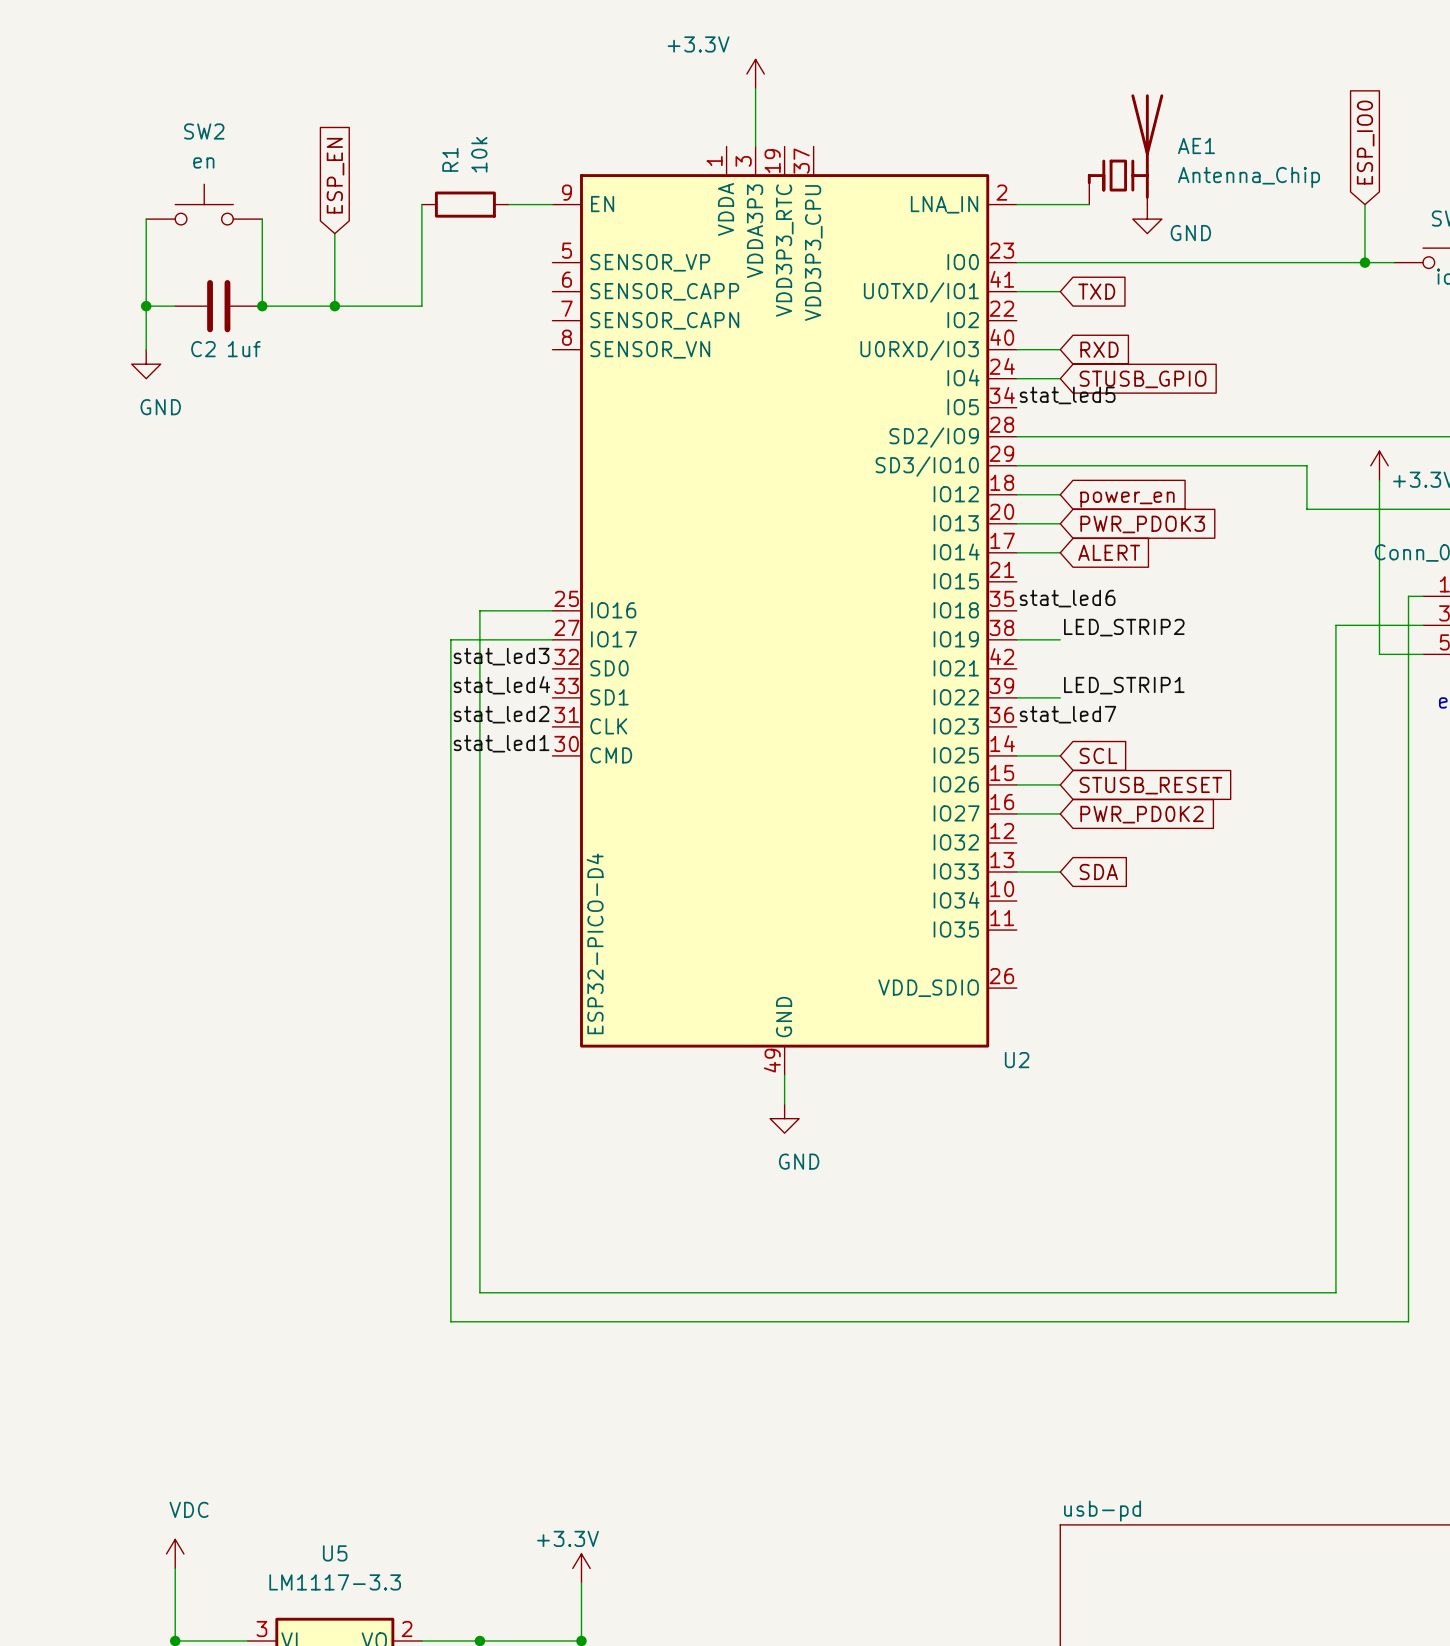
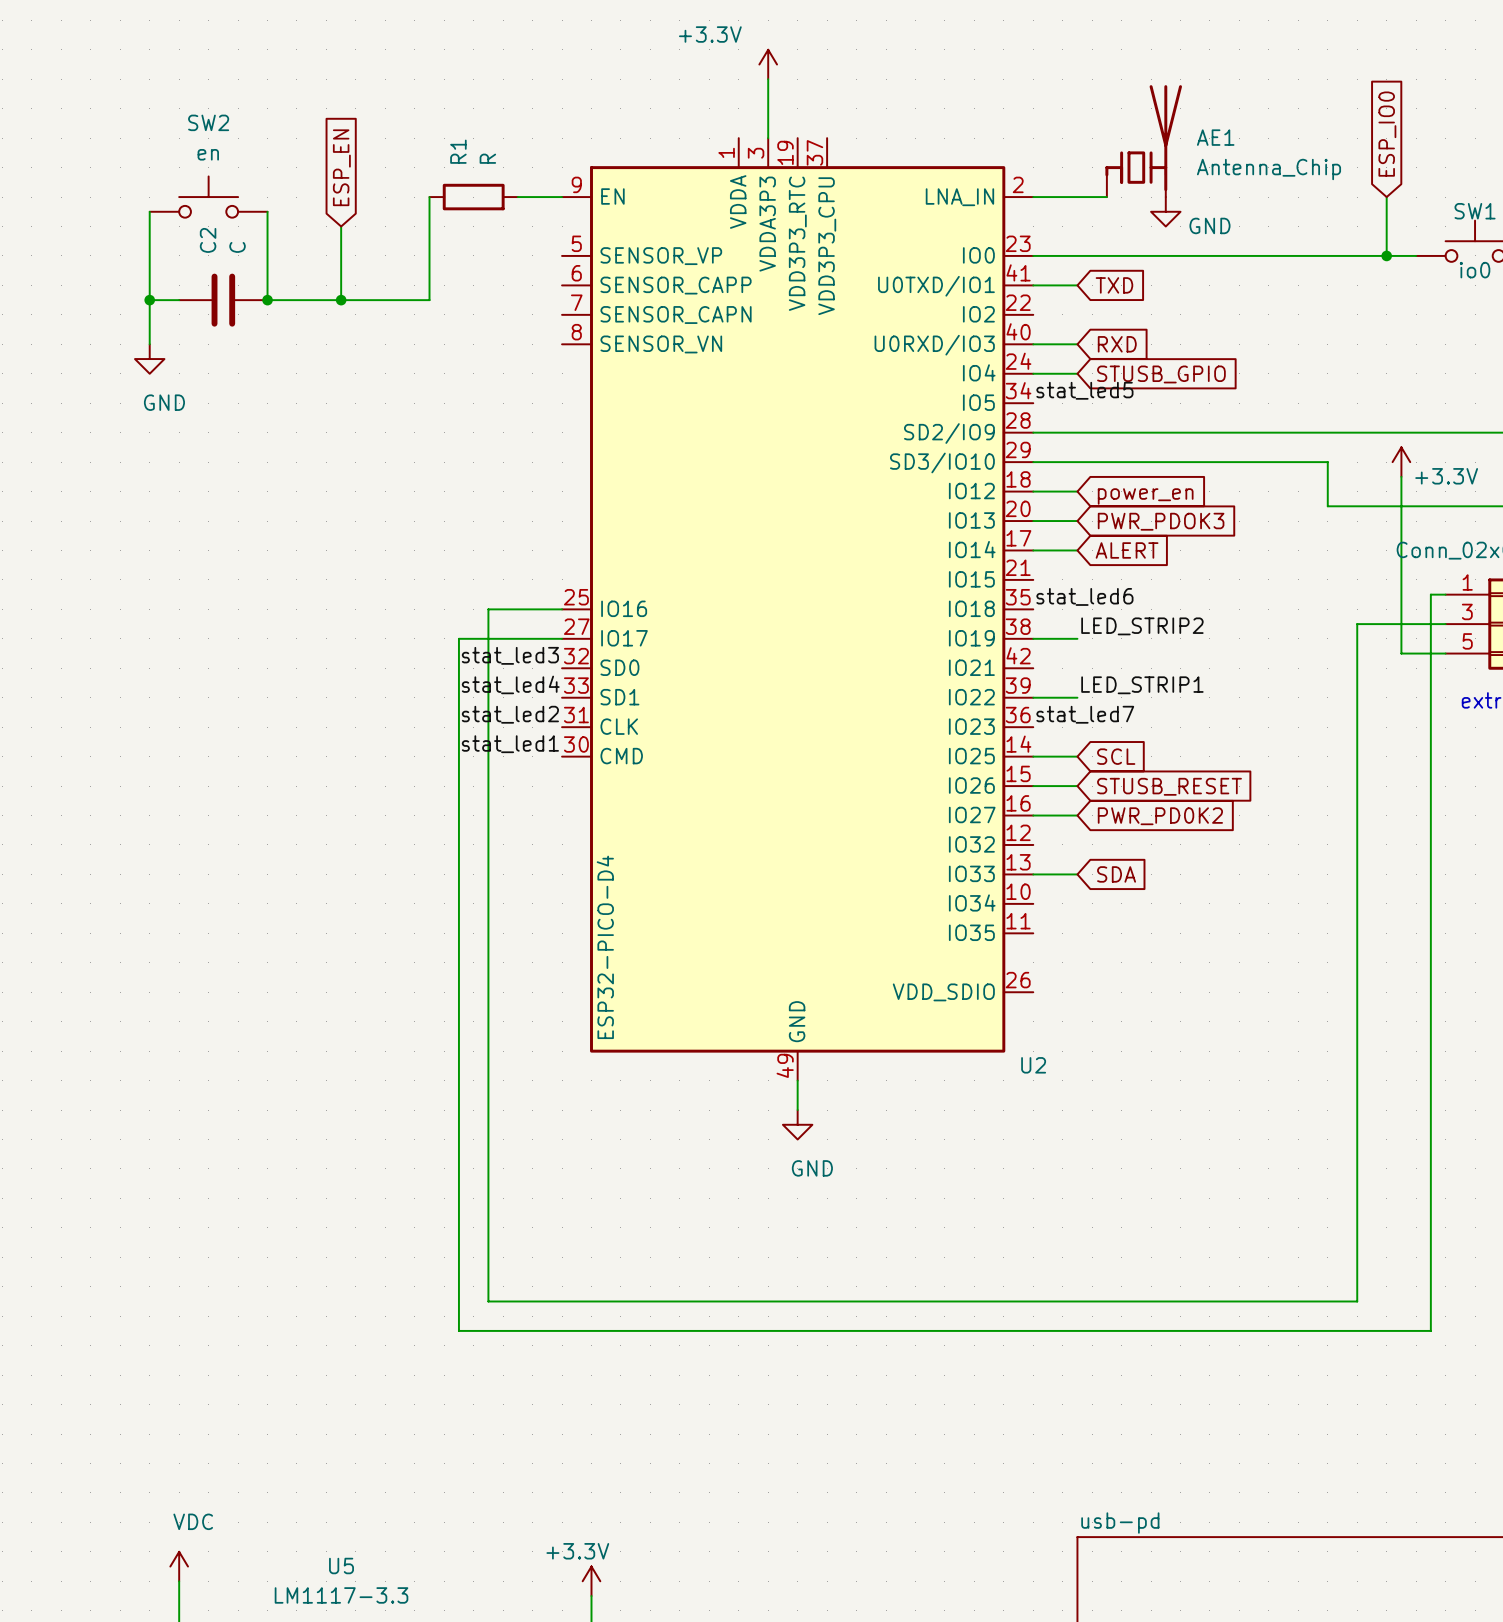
R1 value: 10k (479, 154) -> R (487, 158)
C2 name rotation: 0° (203, 349) -> 90° counterclockwise (208, 240)
C2 name position: C2 (203, 349) -> C2 (208, 240)
C2 value: 1uf (244, 349) -> C (237, 247)

